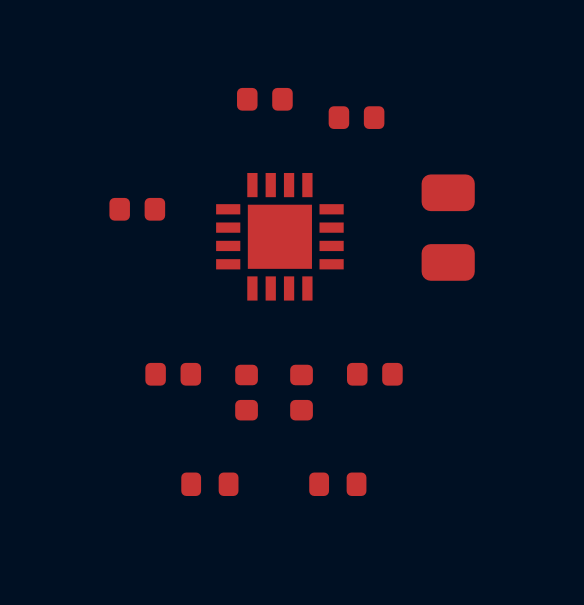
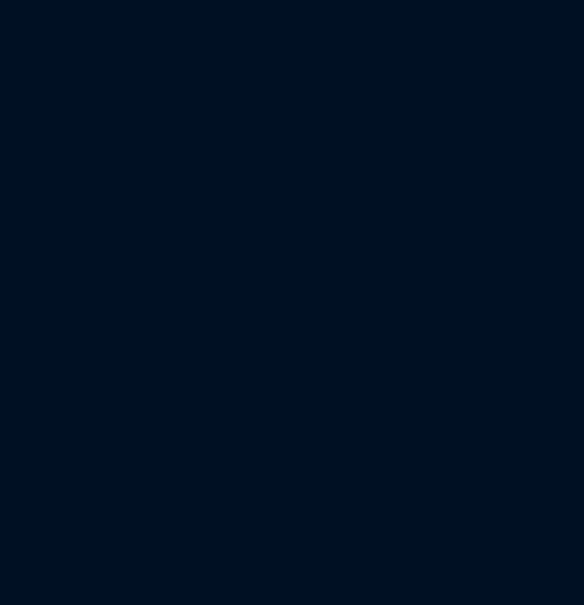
part: (264, 99) -> none
part: (356, 117) -> none
part: (137, 209) -> none
part: (448, 227) -> none
part: (279, 236) -> none
part: (173, 374) -> none
part: (374, 374) -> none
part: (246, 392) -> none
part: (301, 392) -> none
part: (209, 484) -> none
part: (337, 484) -> none

